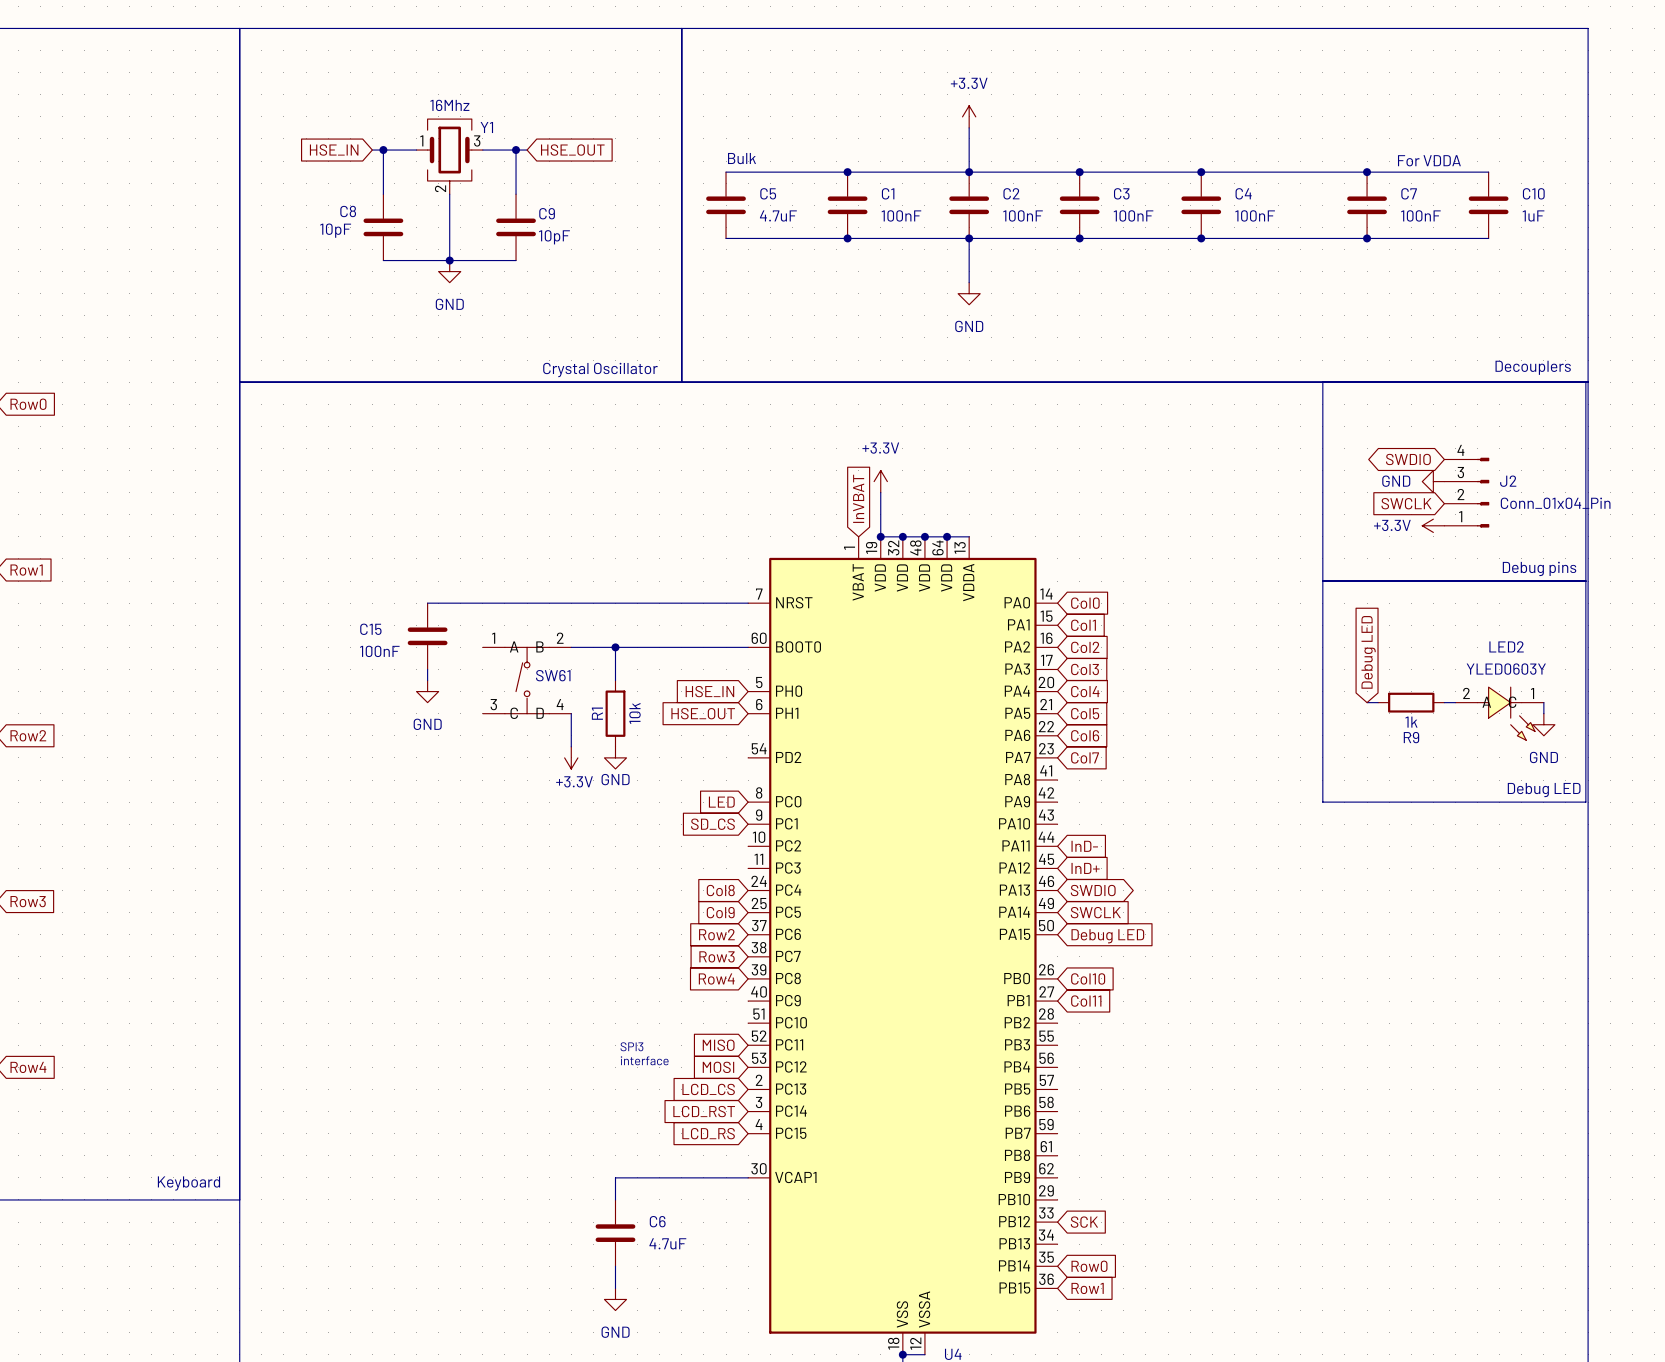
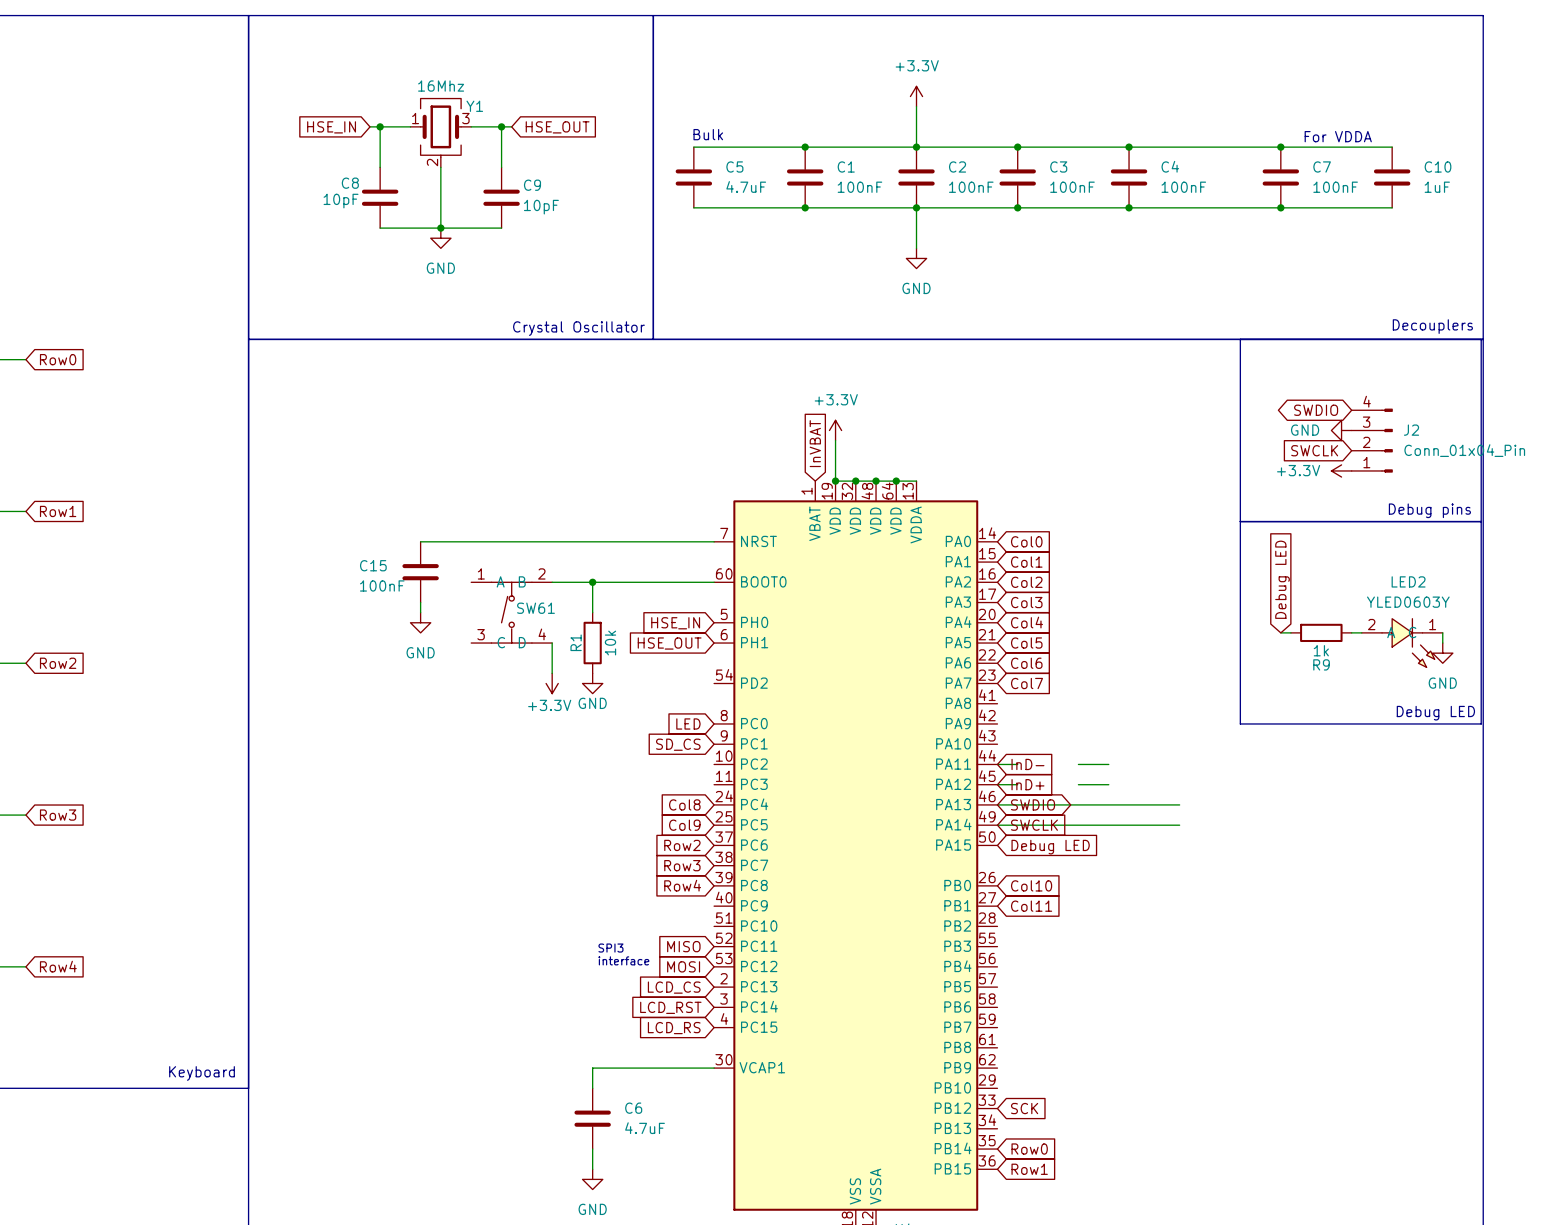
wire: none -> (997, 764) (1017, 764)
wire: none -> (1078, 764) (1108, 764)
wire: none -> (997, 784) (1017, 784)
wire: none -> (1078, 784) (1108, 784)
wire: none -> (997, 804) (1179, 804)
wire: none -> (997, 825) (1179, 825)

